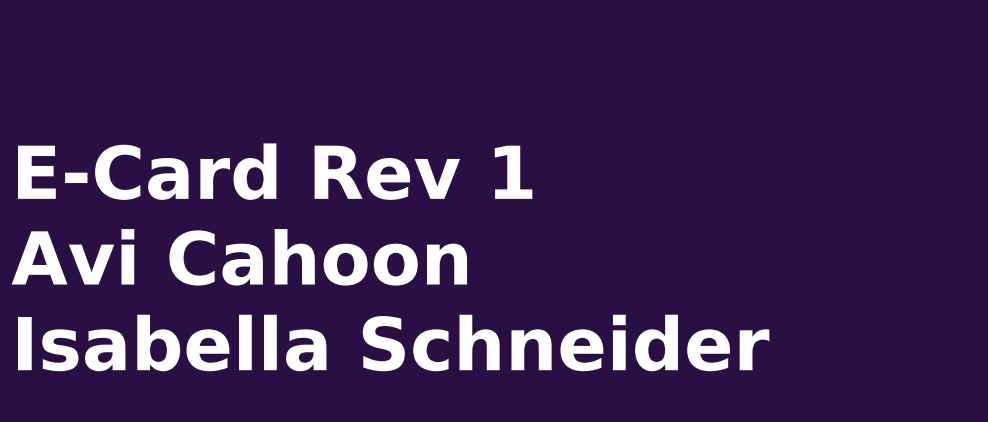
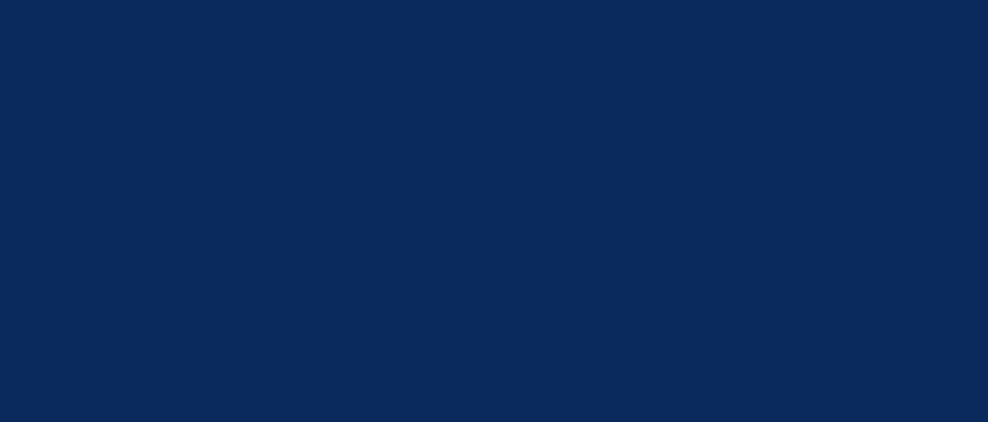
text: E-Card Rev 1 (275, 171) -> none
text: Avi Cahoon (239, 257) -> none
text: Isabella Schneider (393, 342) -> none

